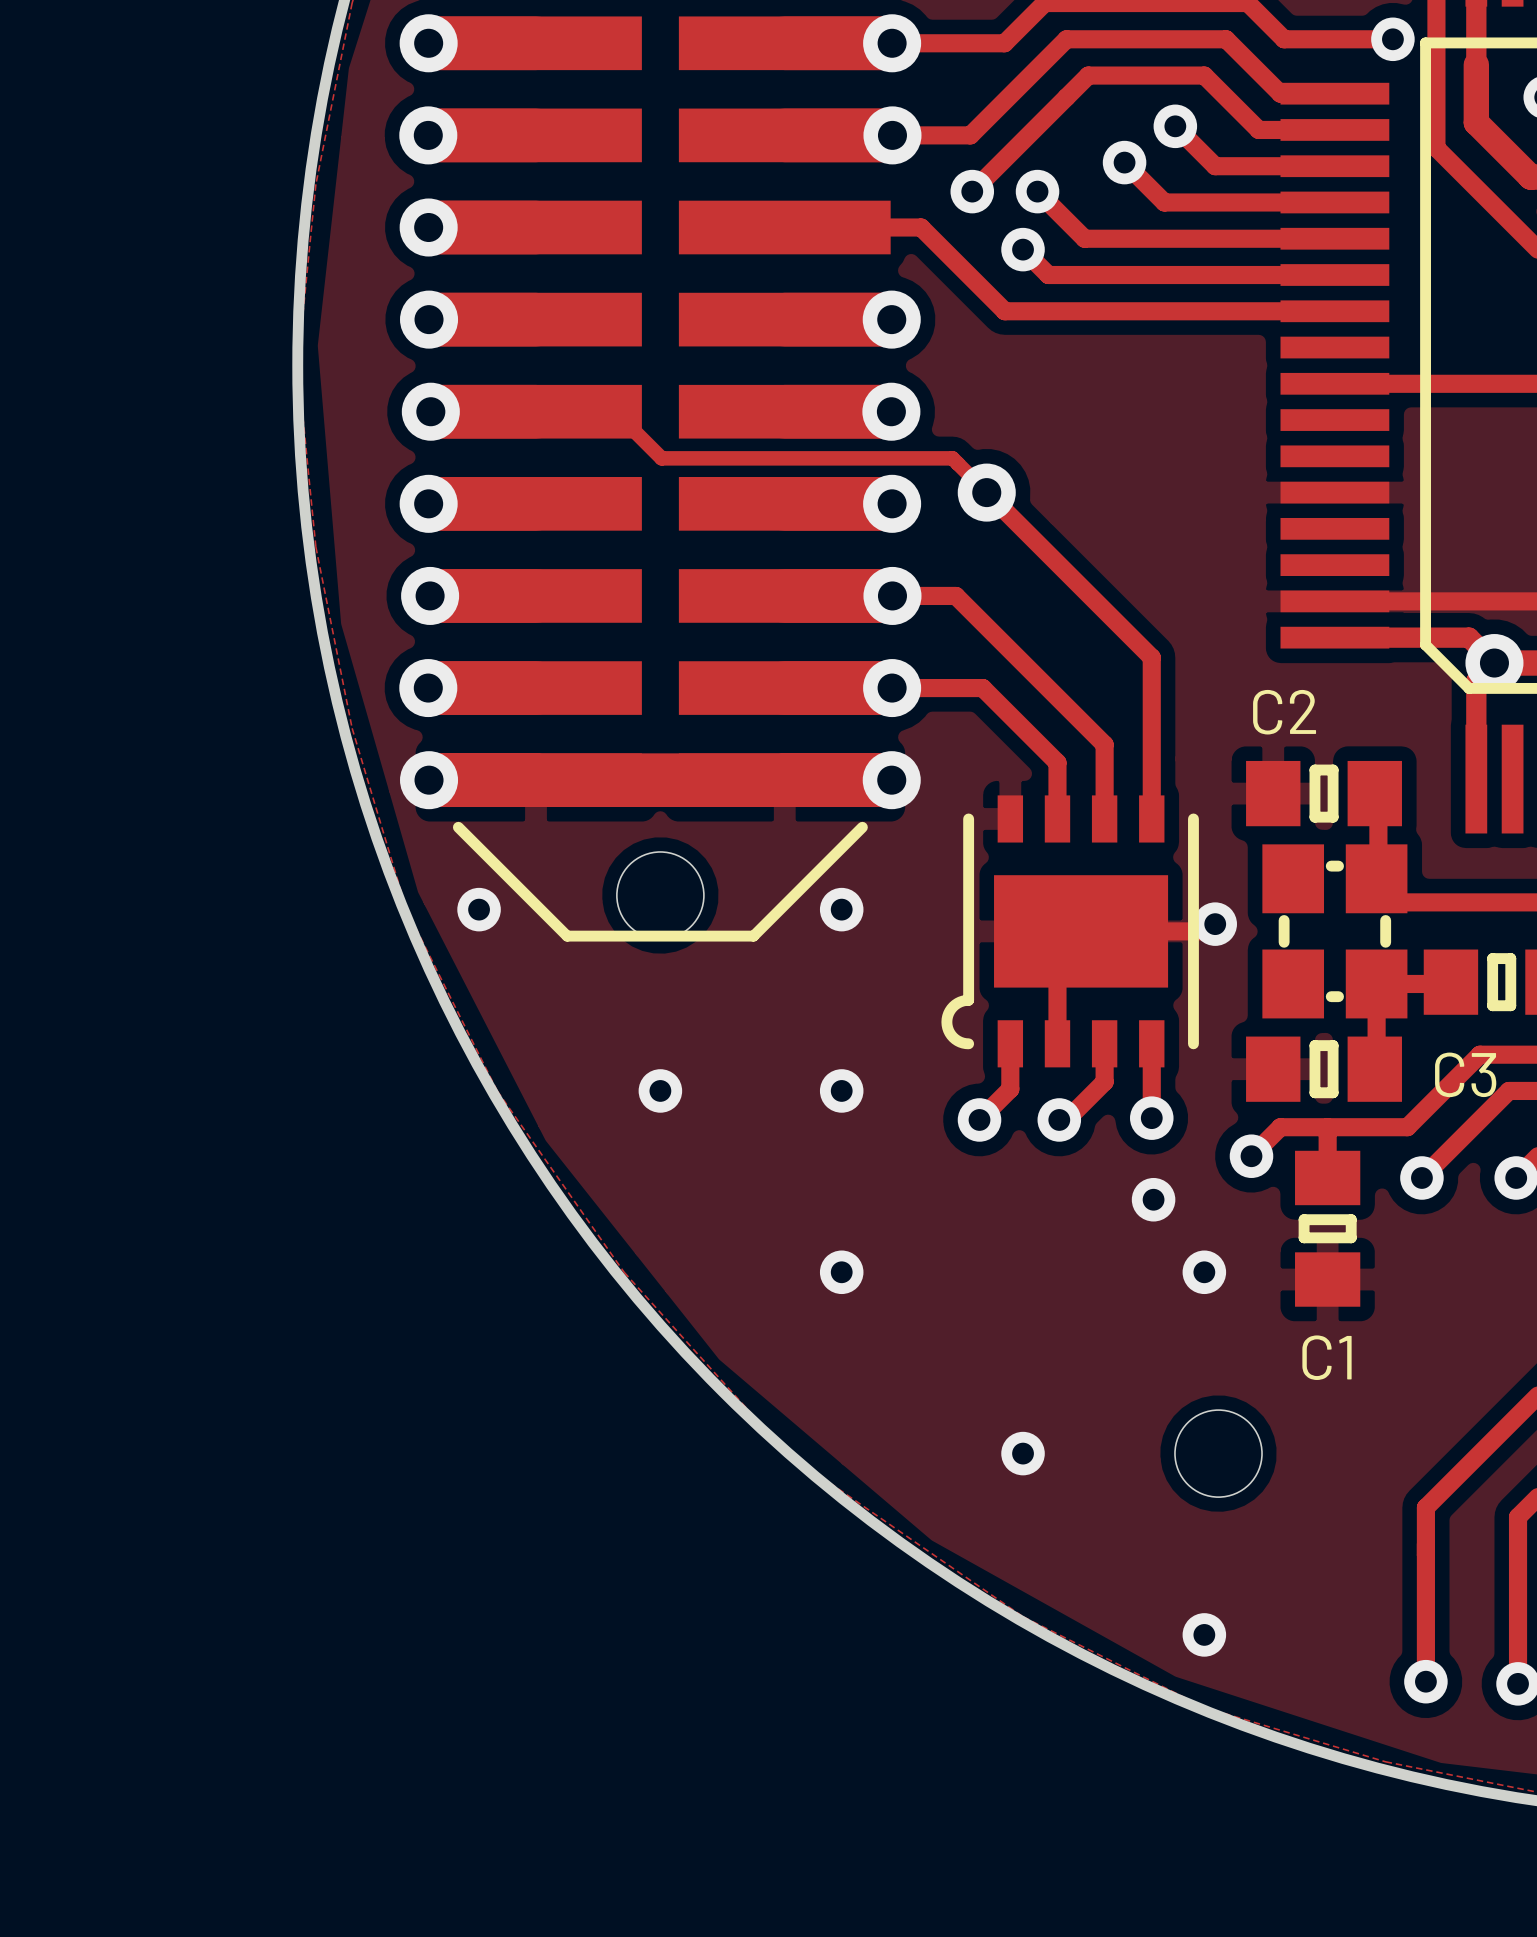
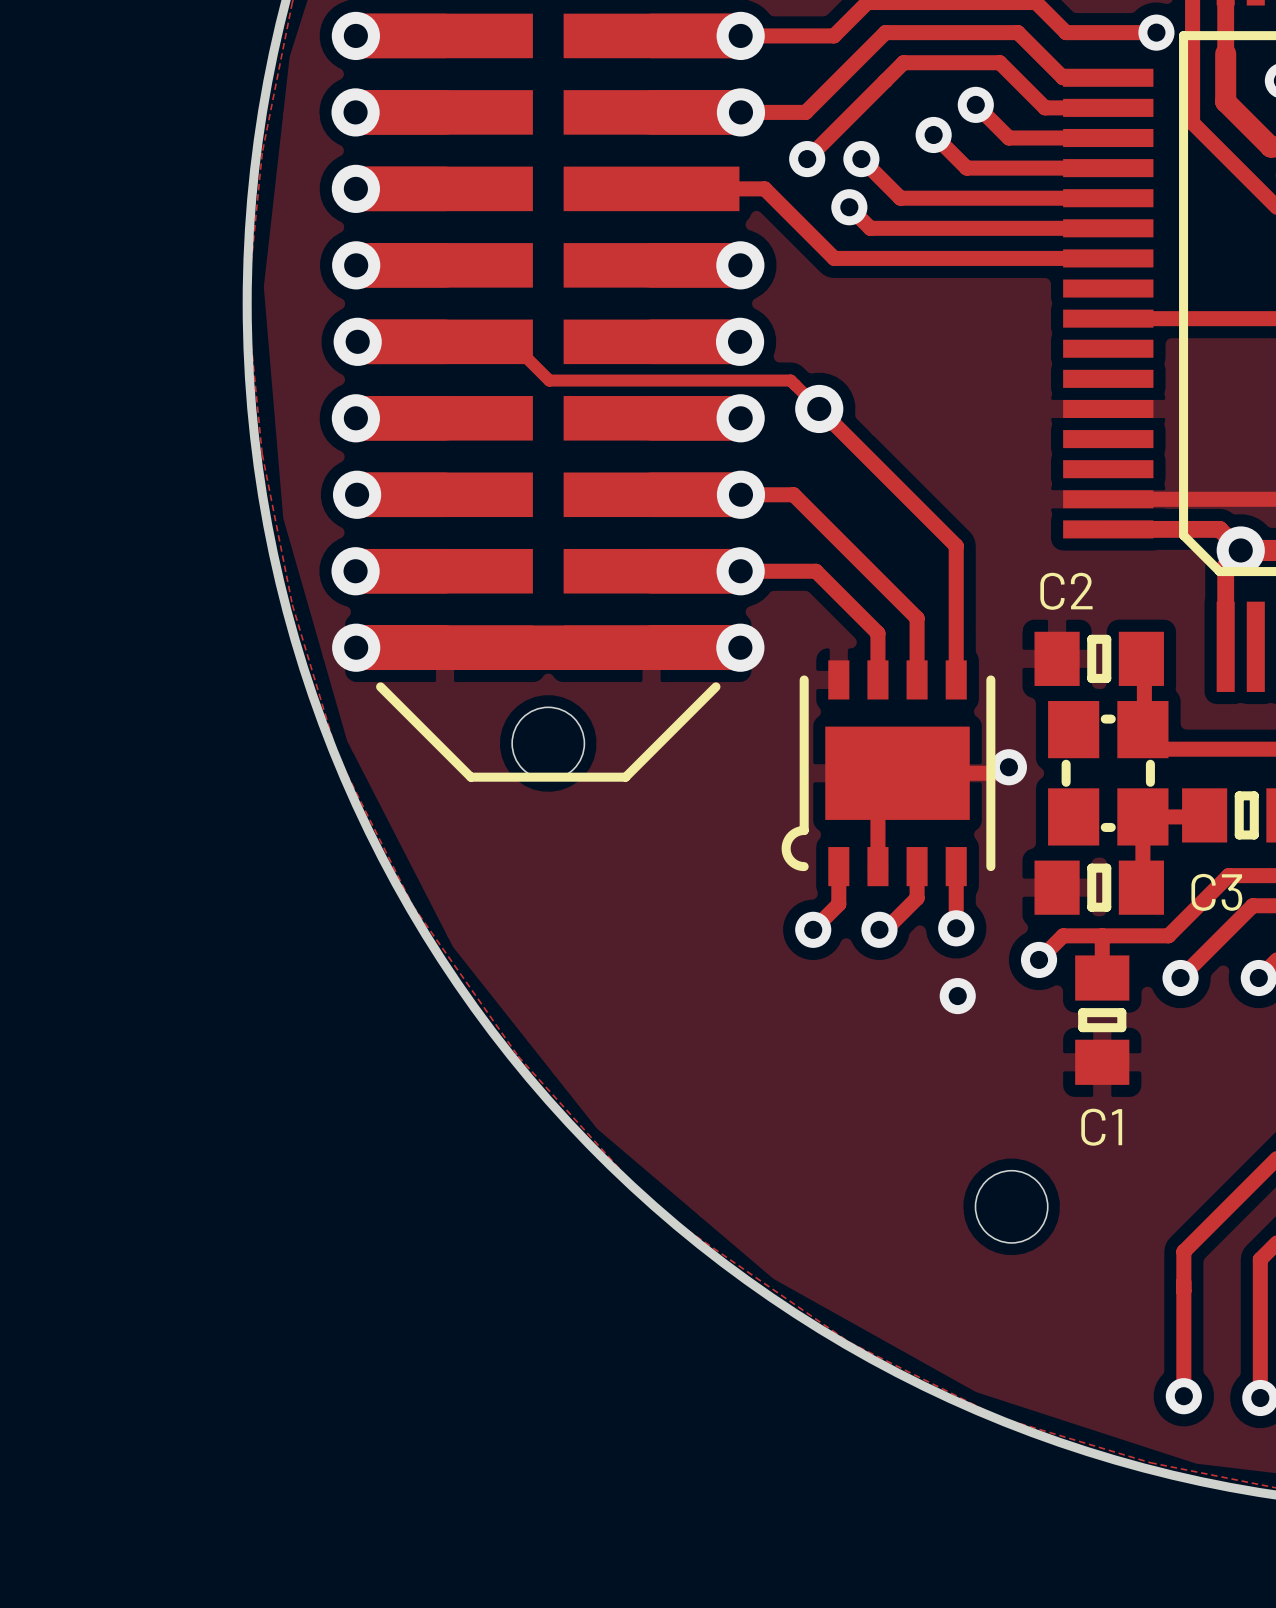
via: (479, 909) -> none
via: (841, 909) -> none
via: (660, 1090) -> none
via: (841, 1090) -> none
via: (841, 1272) -> none
via: (1204, 1272) -> none
via: (1023, 1453) -> none
via: (1204, 1634) -> none

